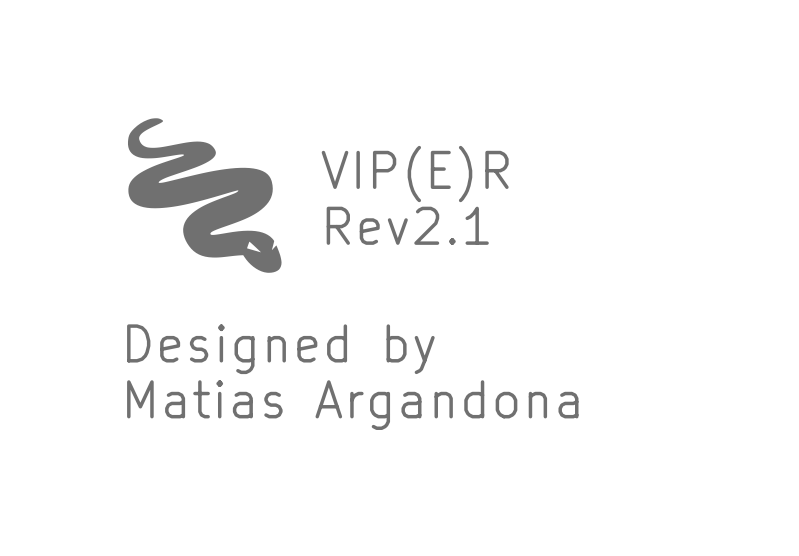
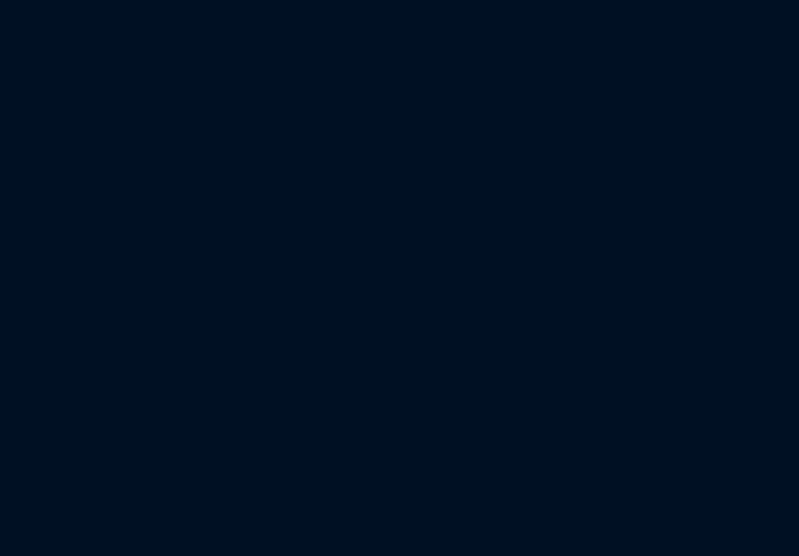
drawing: [127, 118, 282, 273] -> none
text: VIP(E)R (415, 174) -> none
text: Rev2.1 (407, 225) -> none
text: Designed by (280, 349) -> none
text: Matias Argandona (352, 405) -> none

